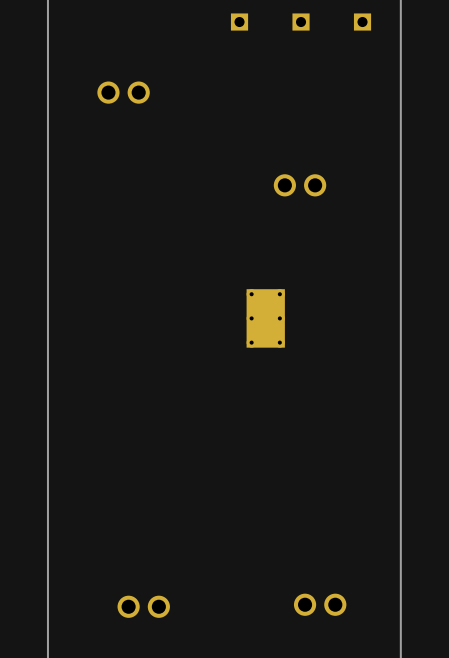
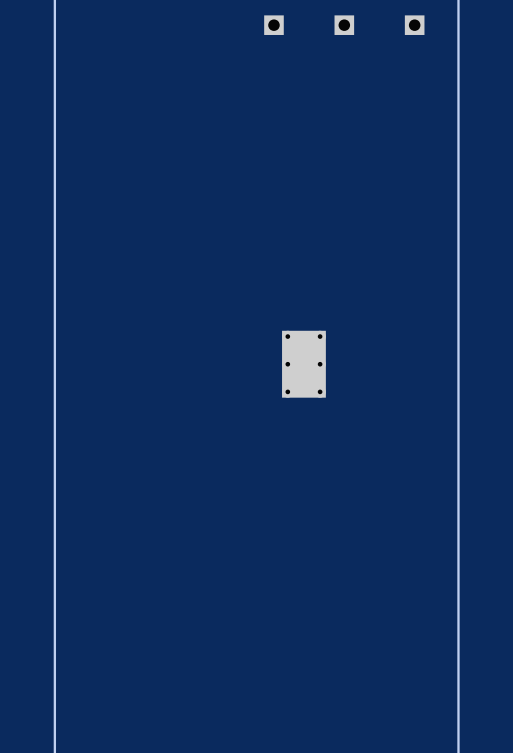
part: (123, 92) -> none
part: (300, 185) -> none
part: (320, 604) -> none
part: (143, 606) -> none

